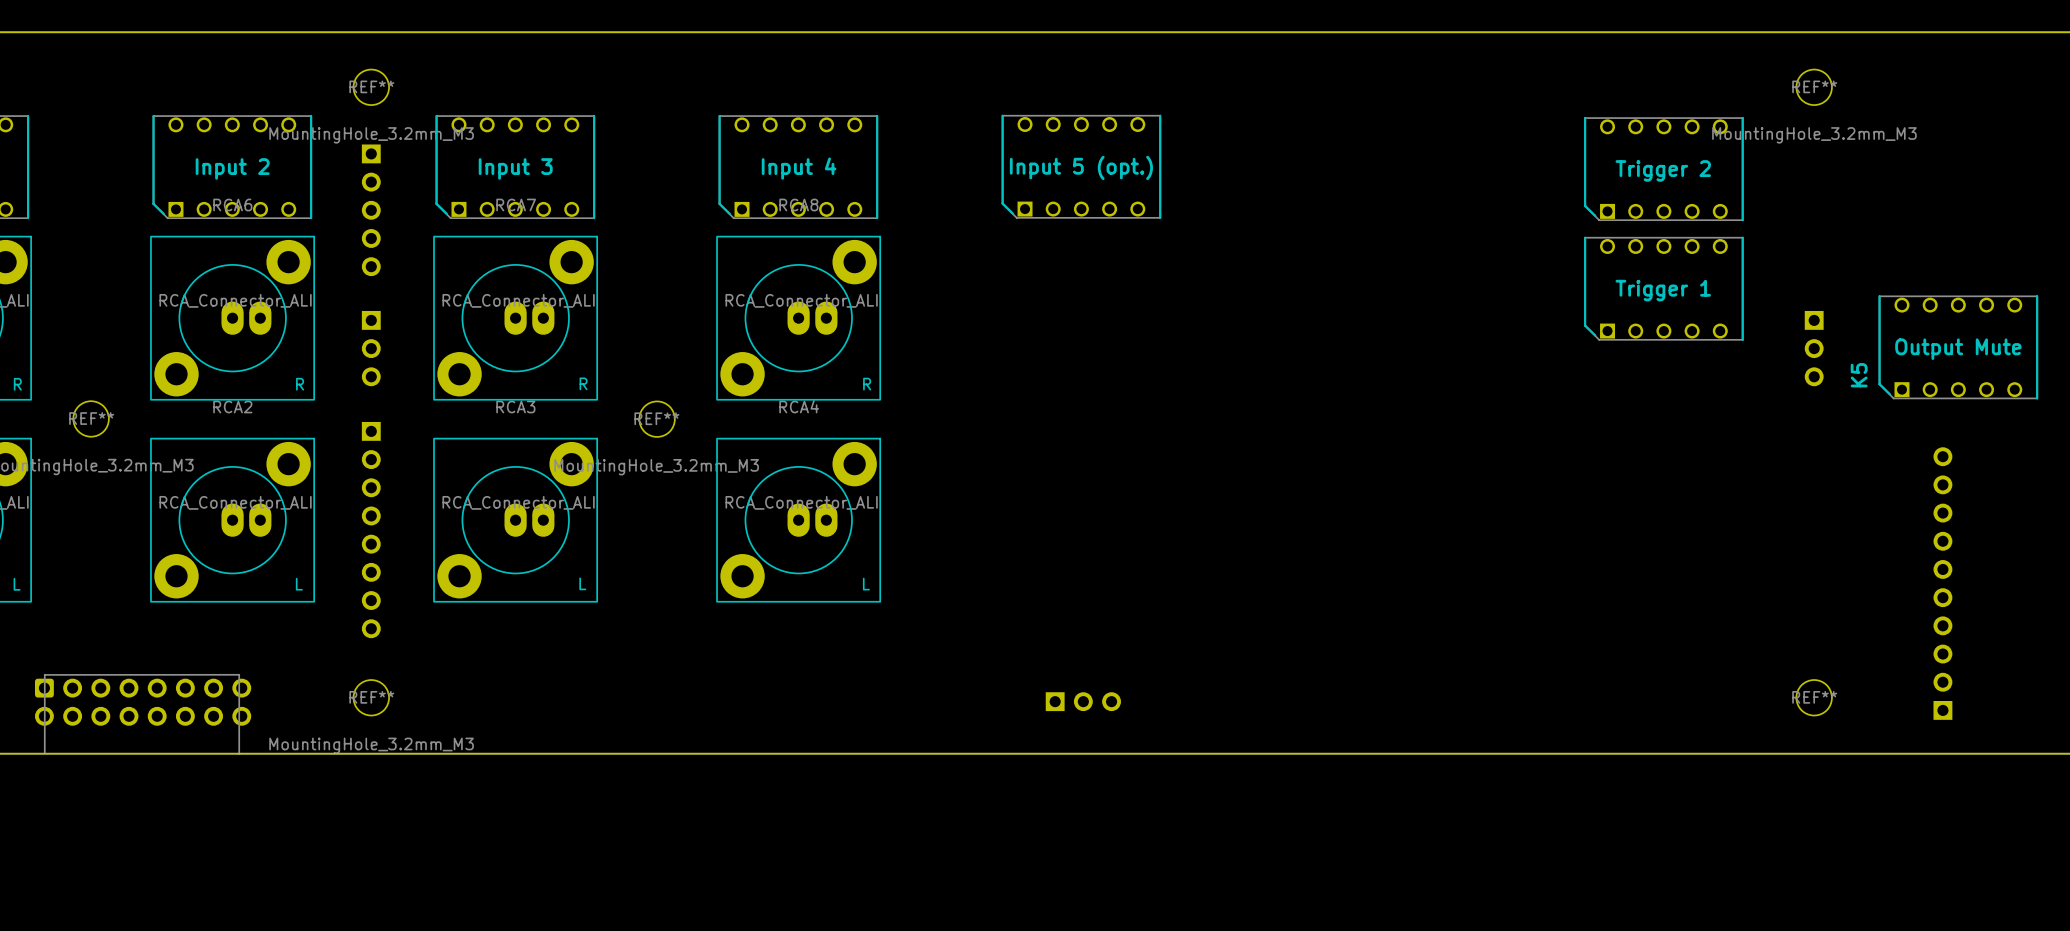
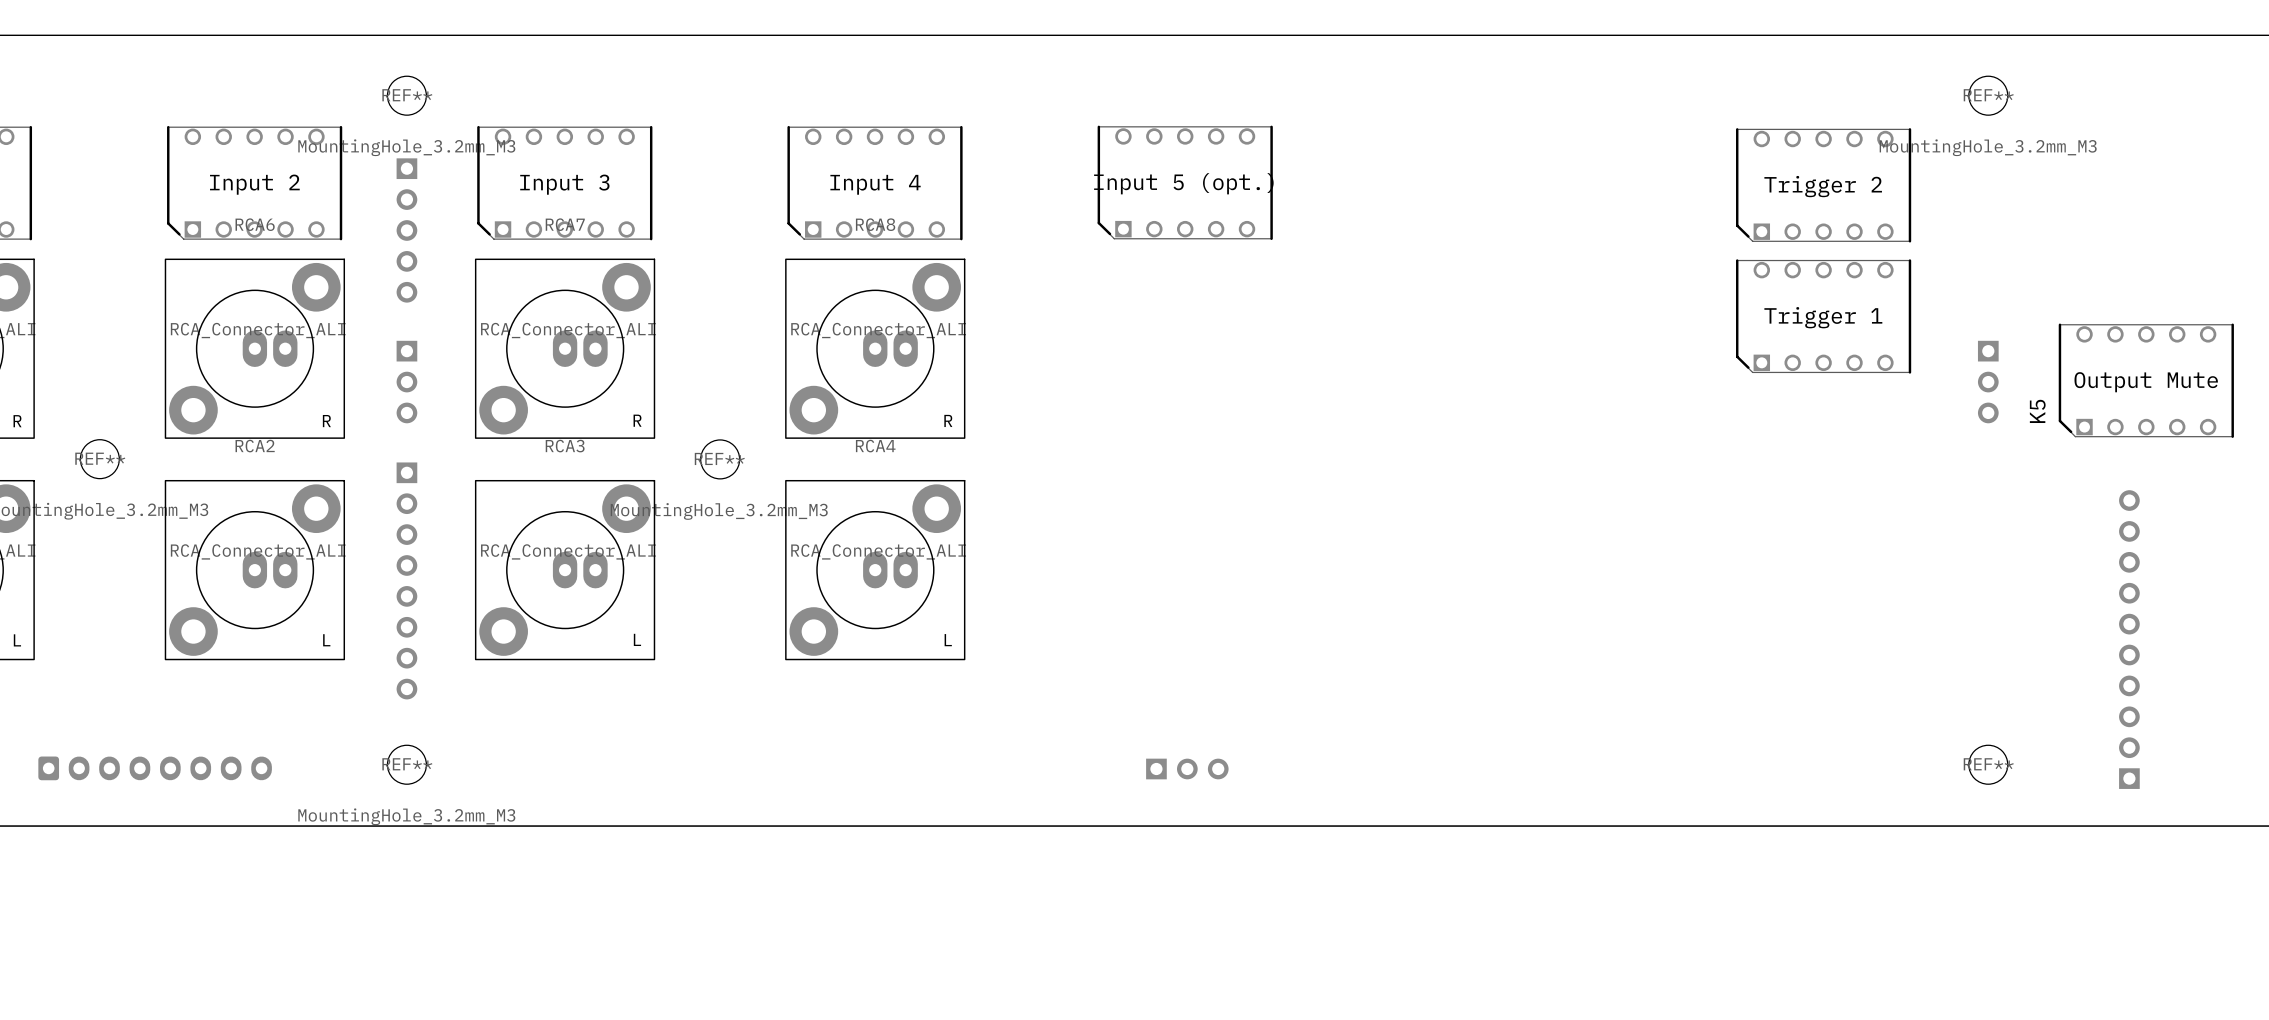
part footprint: [34, 678, 252, 726] -> [38, 756, 272, 781]
line: (44, 752) (44, 674) (239, 674) (239, 754) -> none

